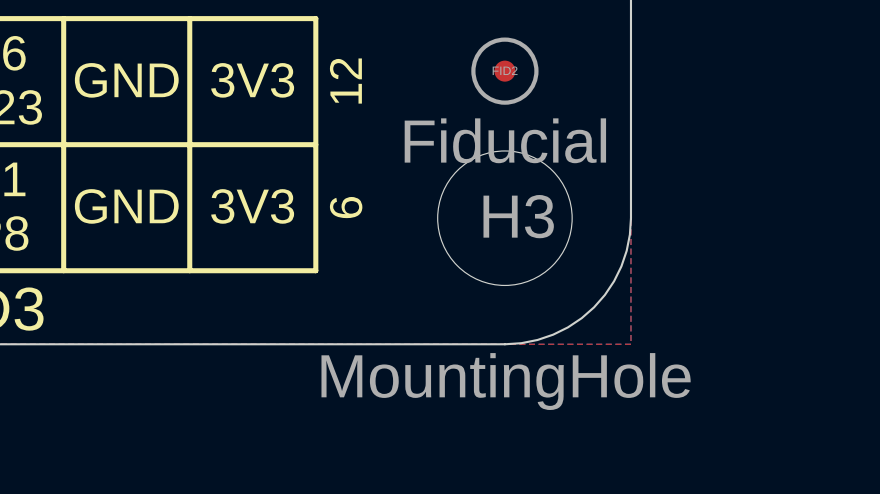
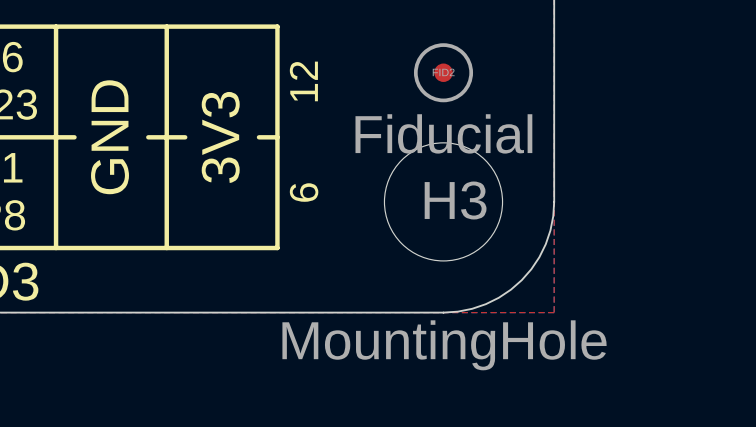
text: GND (126, 80) -> none
text: 3V3 (252, 80) -> none
line: (84, 144) (168, 144) -> none
text: none -> GND (110, 137)
line: (210, 144) (294, 144) -> none
text: none -> 3V3 (220, 137)
text: GND (126, 206) -> none
text: 3V3 (252, 206) -> none

